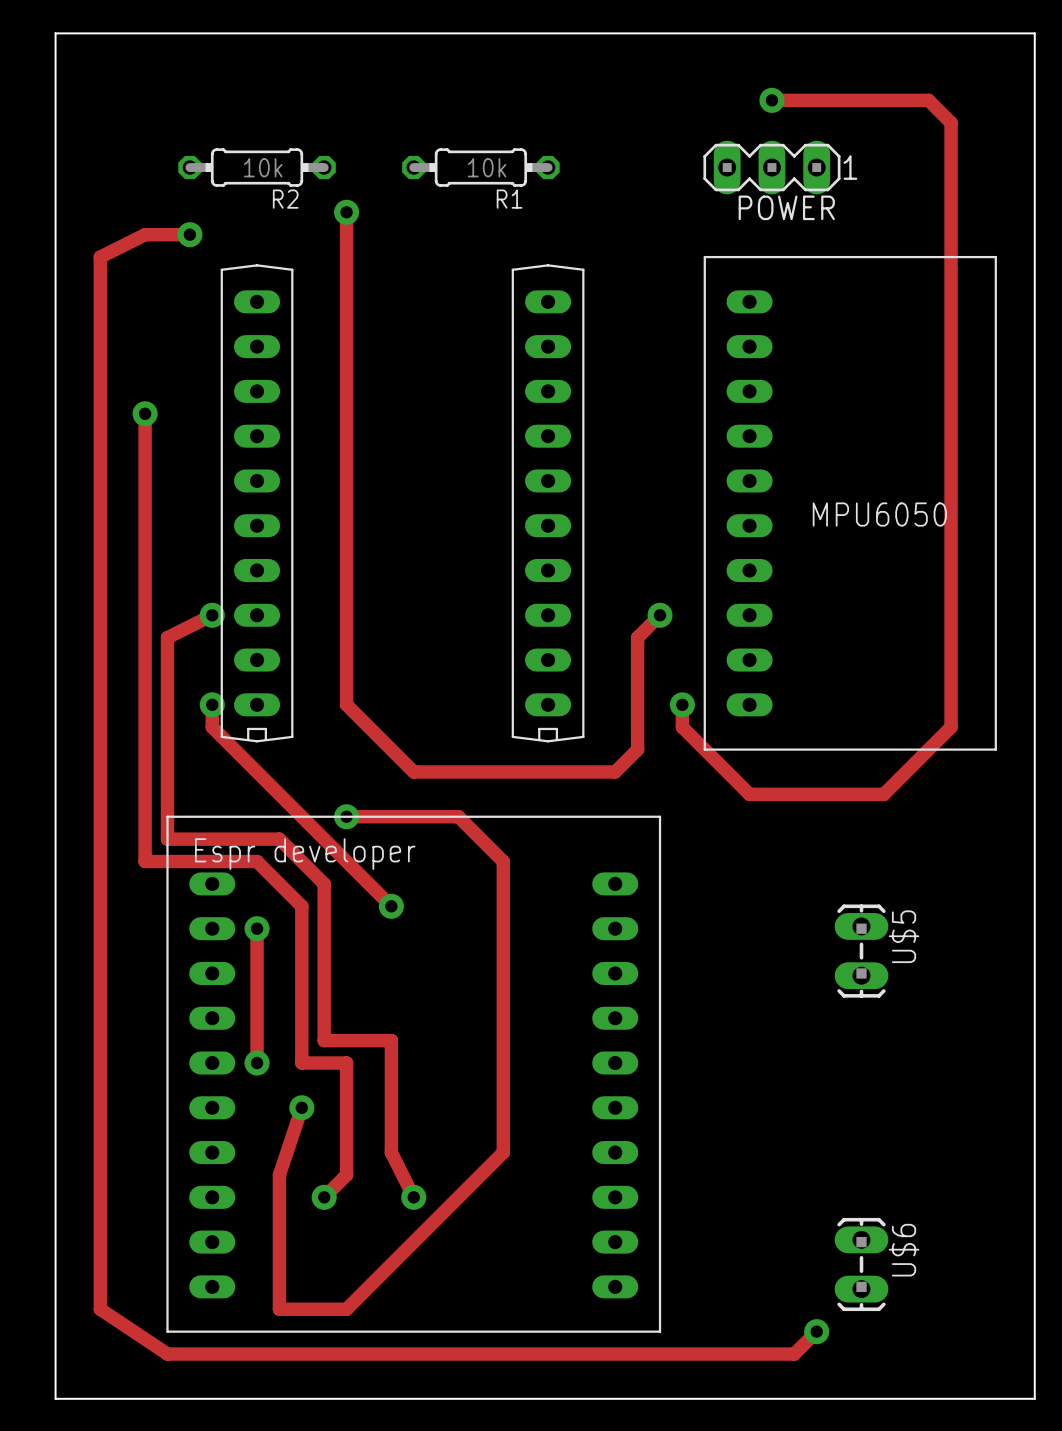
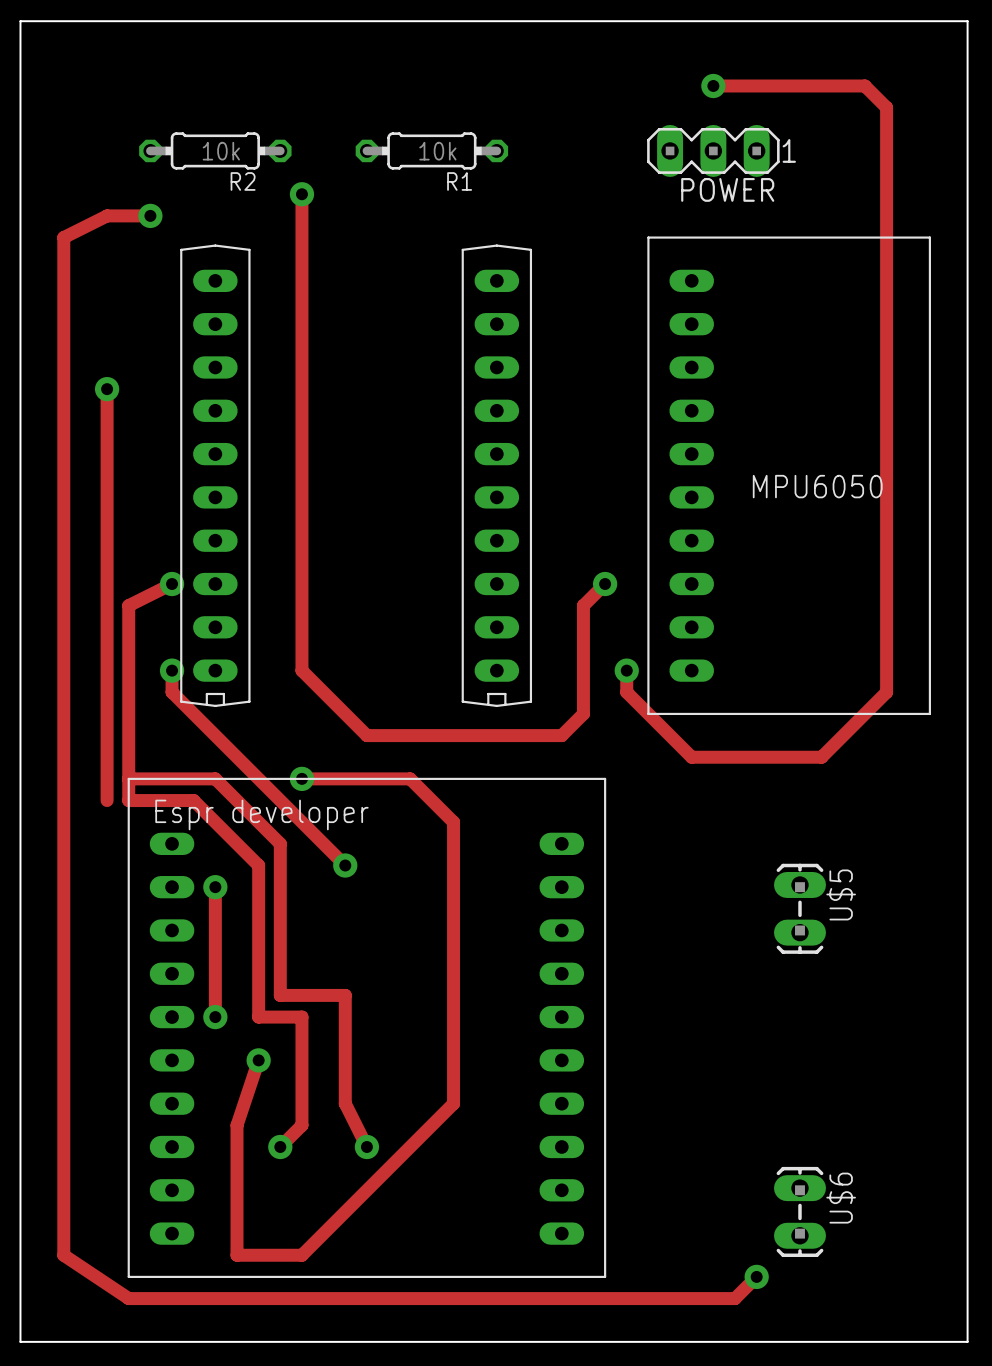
track: none -> (128, 778) (215, 778) (237, 800)
track: (145, 839) (145, 861) (257, 861) -> none
track: (234, 839) (279, 839) -> (193, 800) (215, 822)

